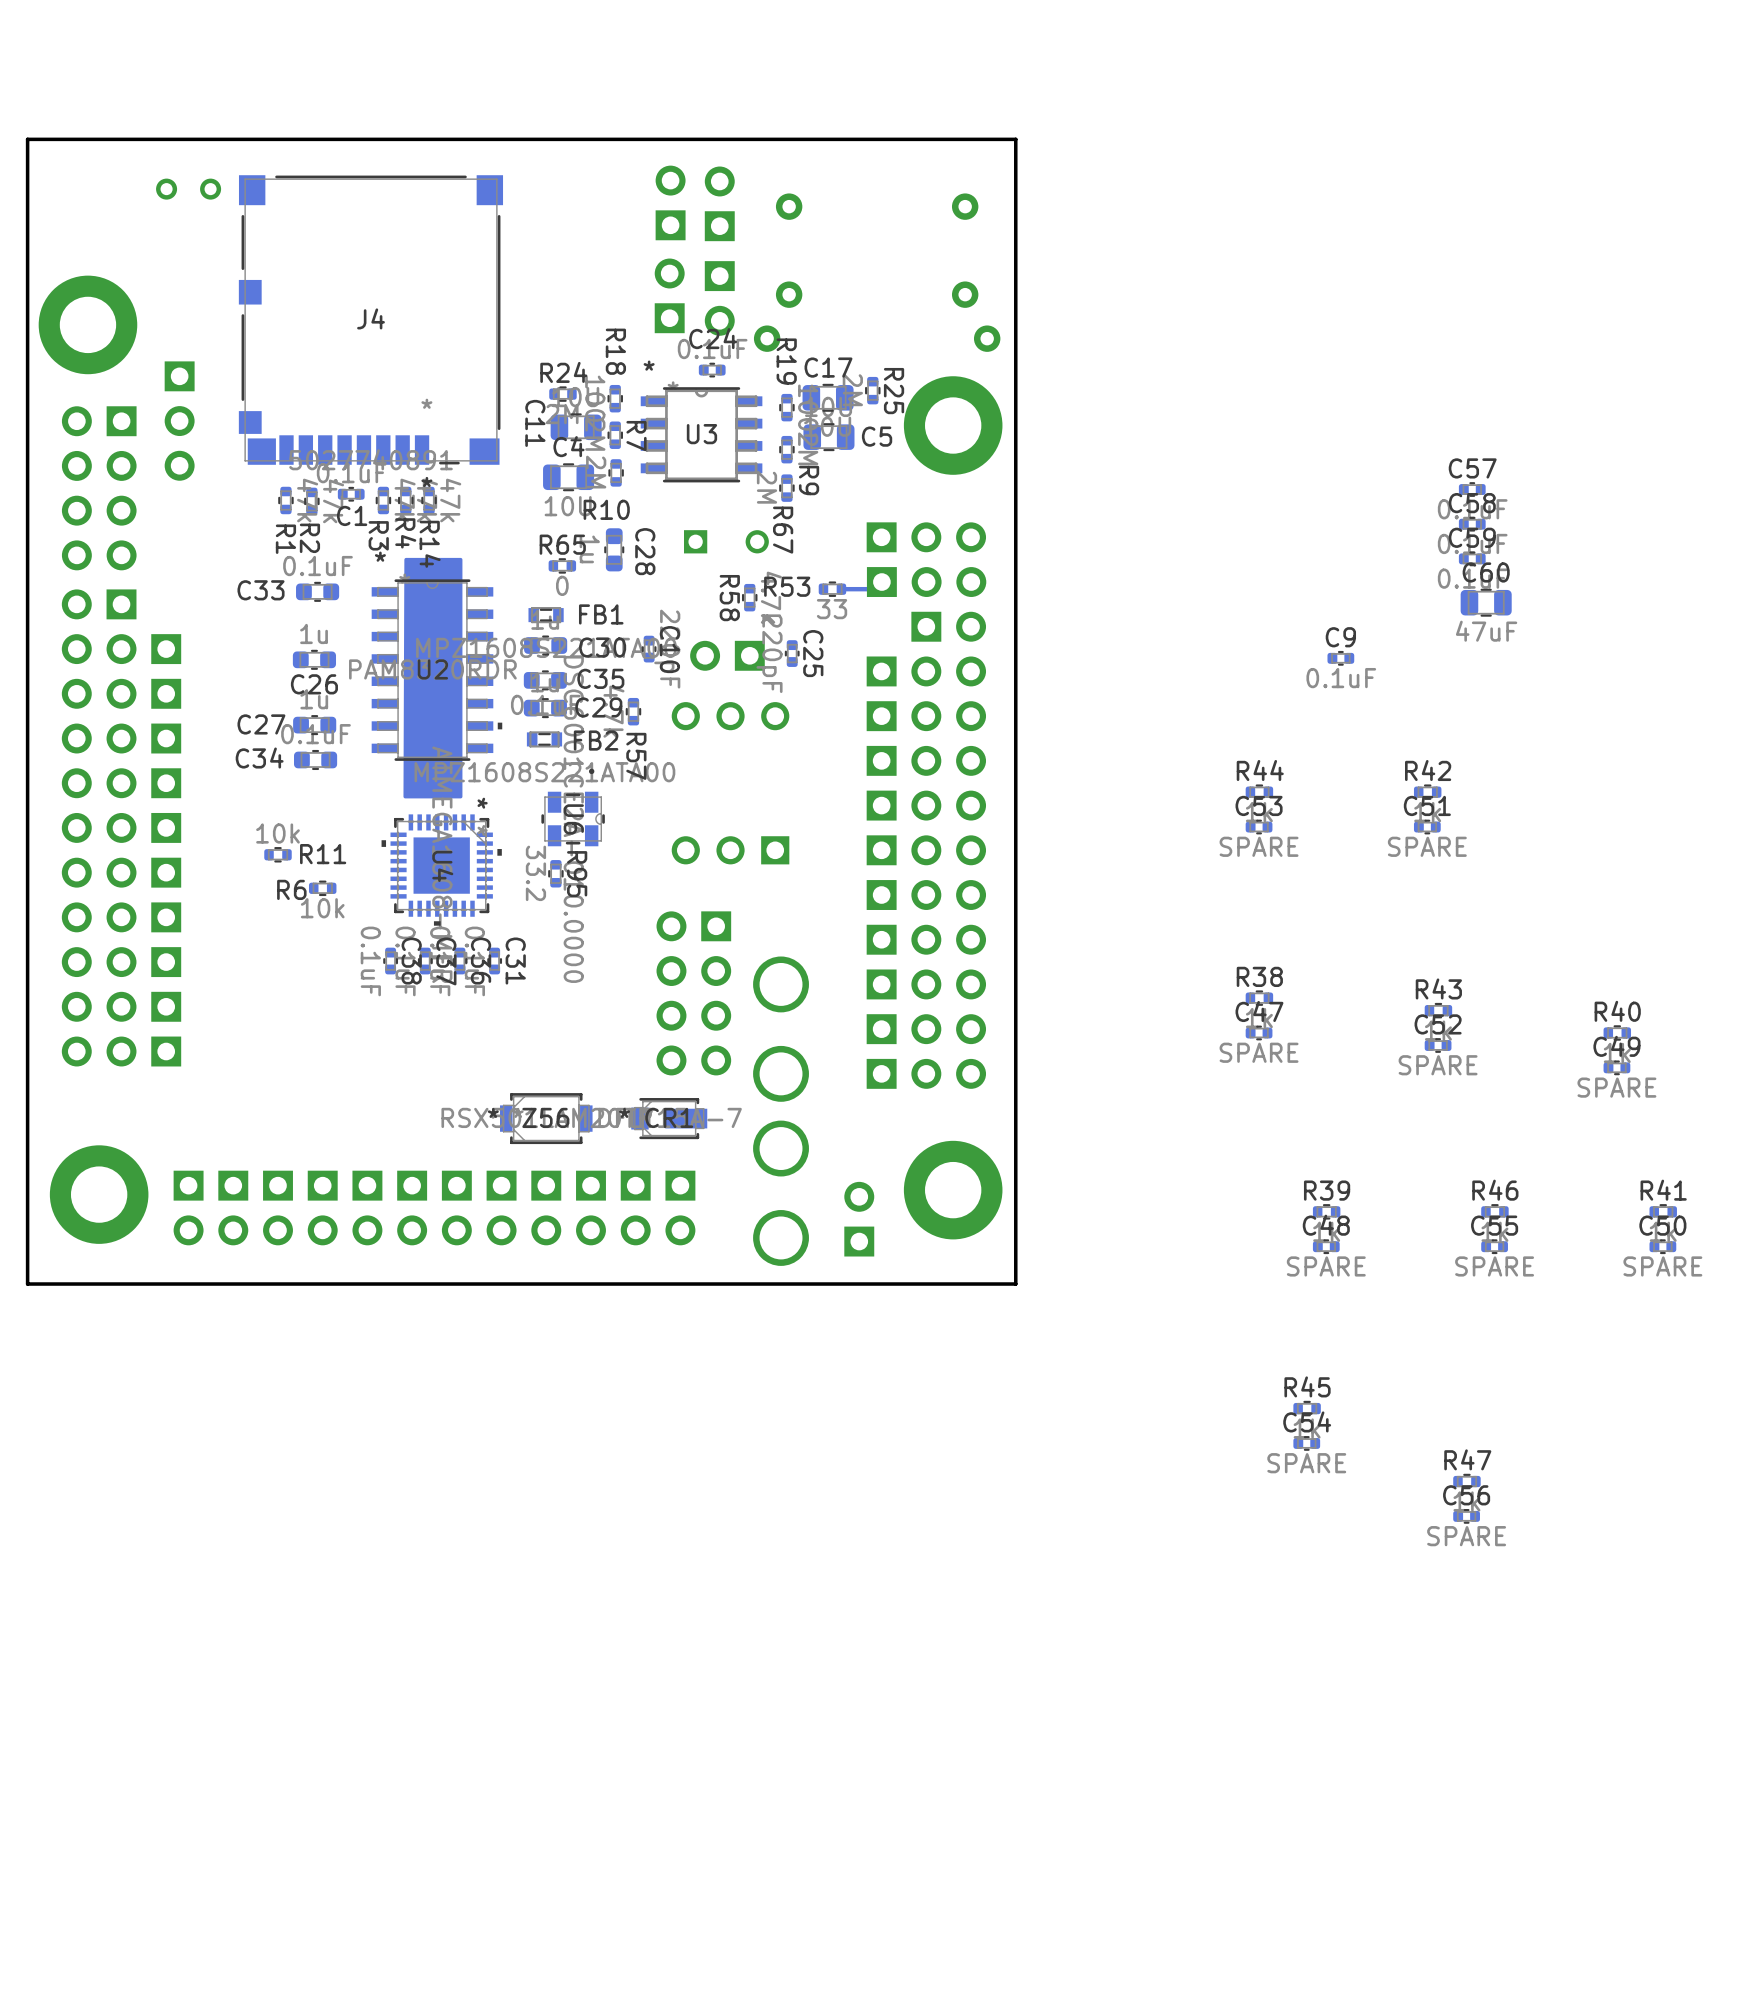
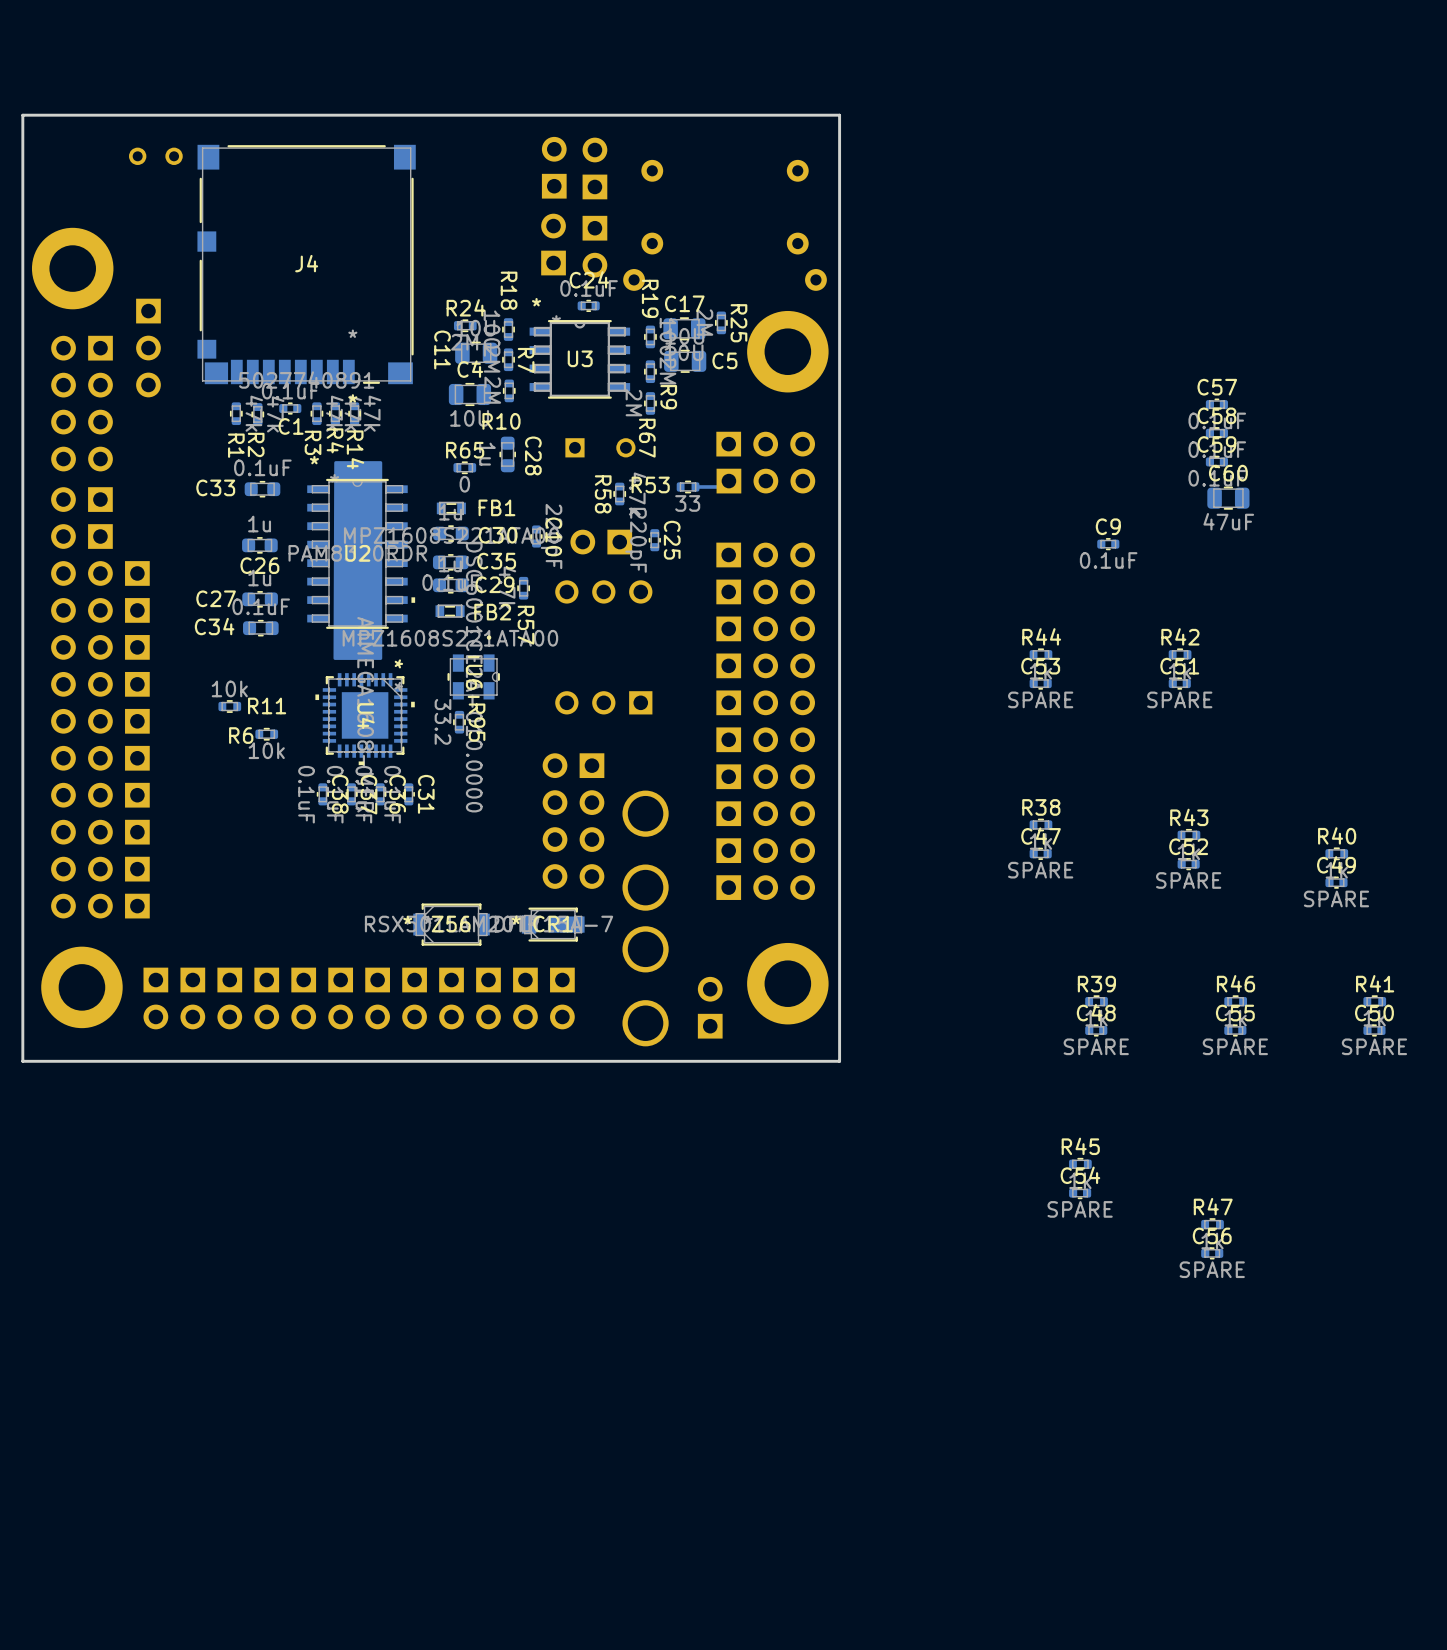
part: (948, 626) -> none
part: none -> (81, 536)
part: (121, 649) -> none
part: none -> (100, 906)

